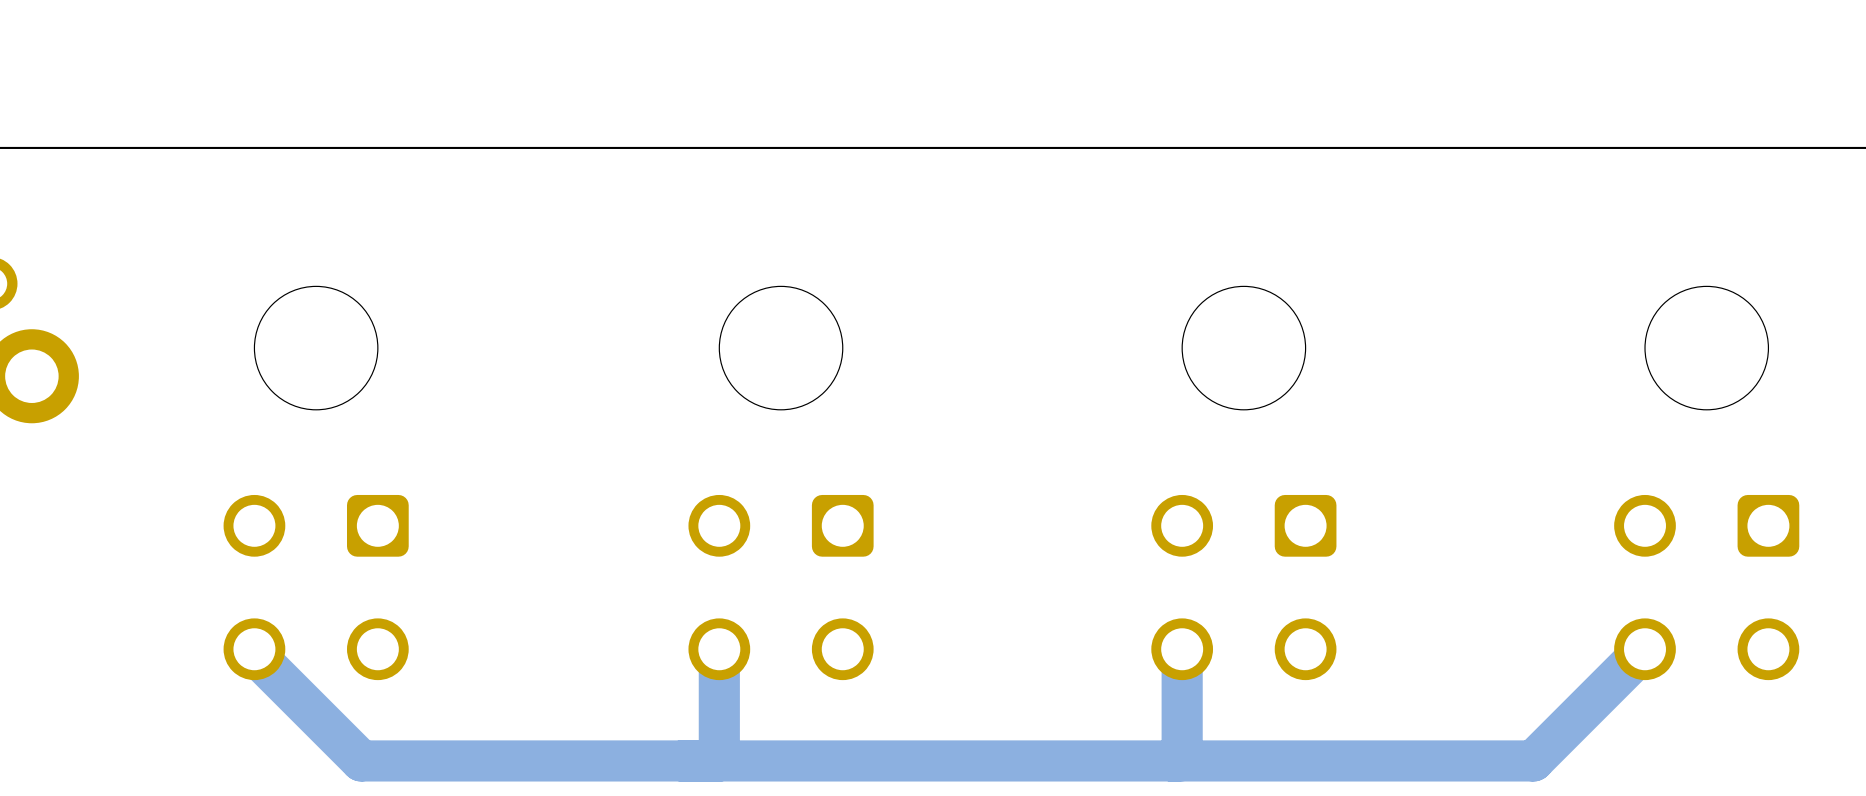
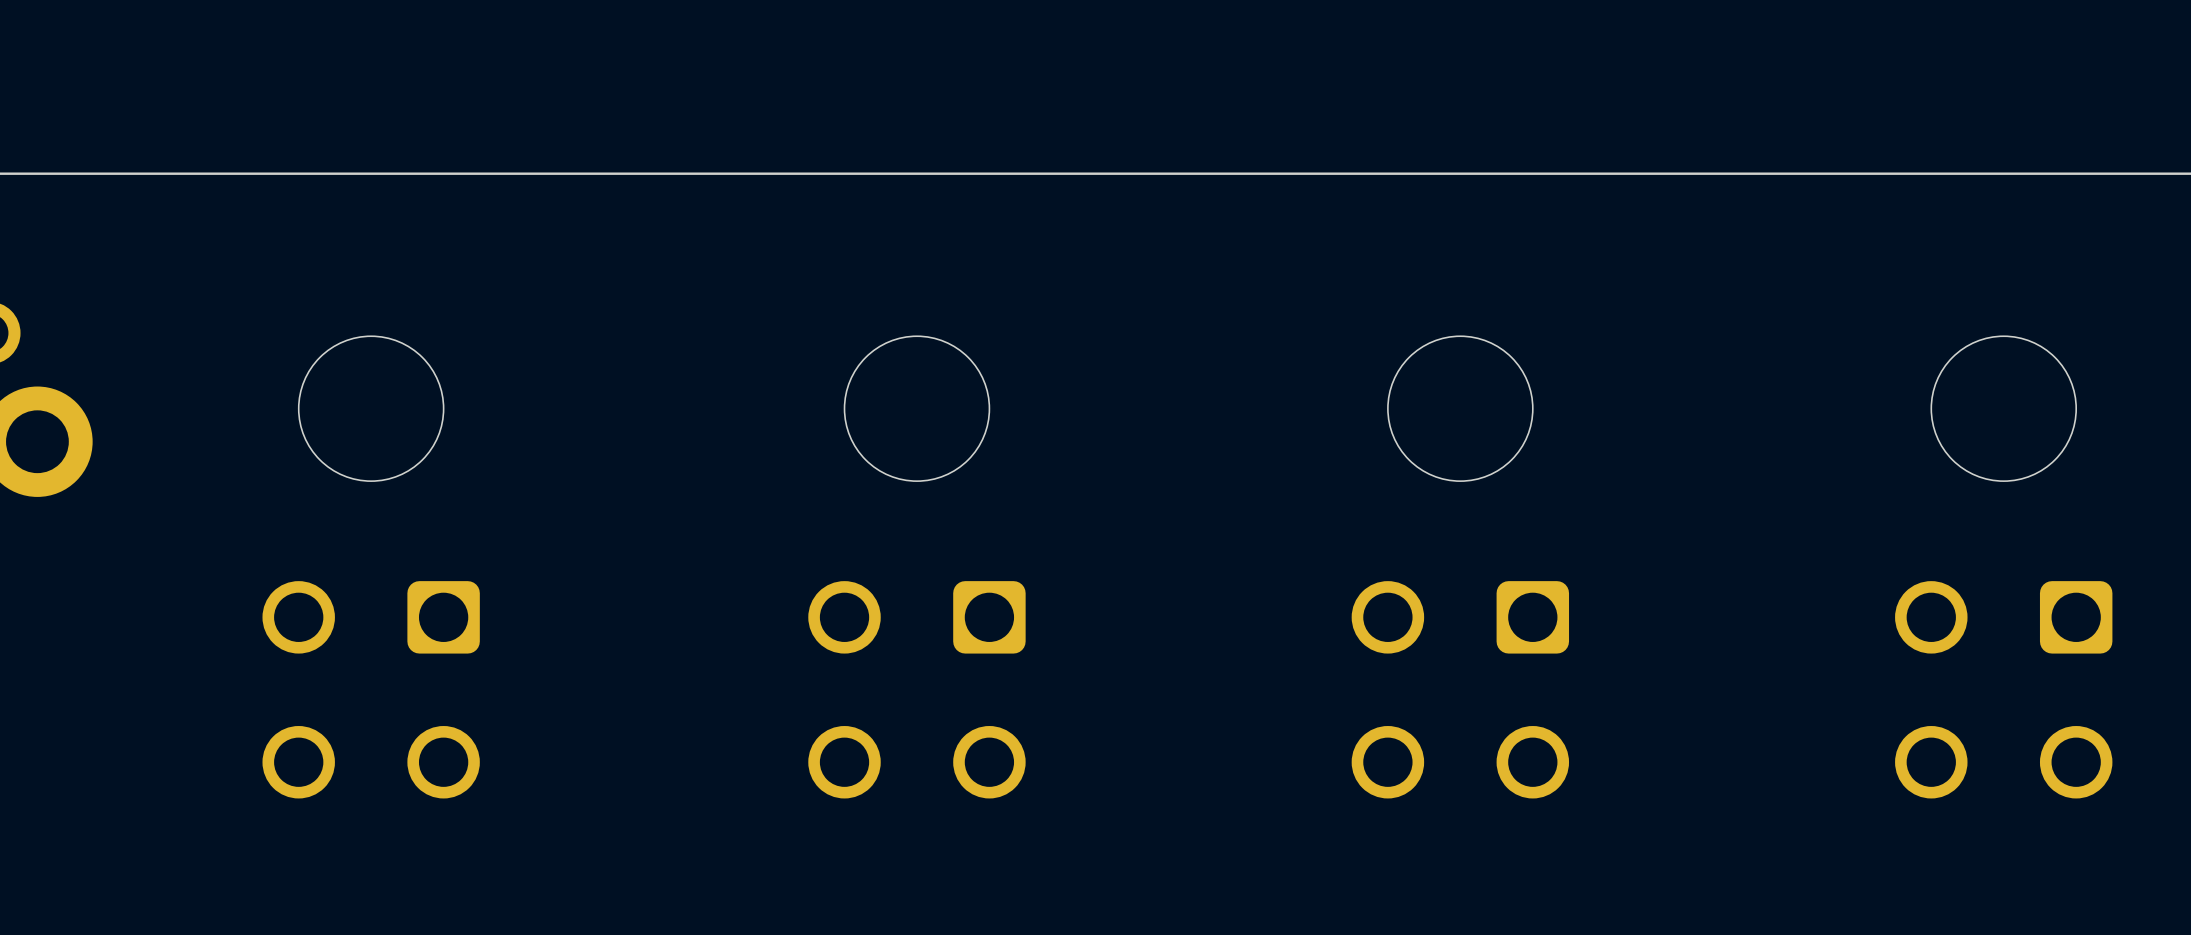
track: (719, 649) (719, 760) -> none
track: (1182, 649) (1182, 750) (1171, 760) -> none
track: (1645, 649) (1533, 760) (361, 760) (254, 653) (254, 649) -> none

